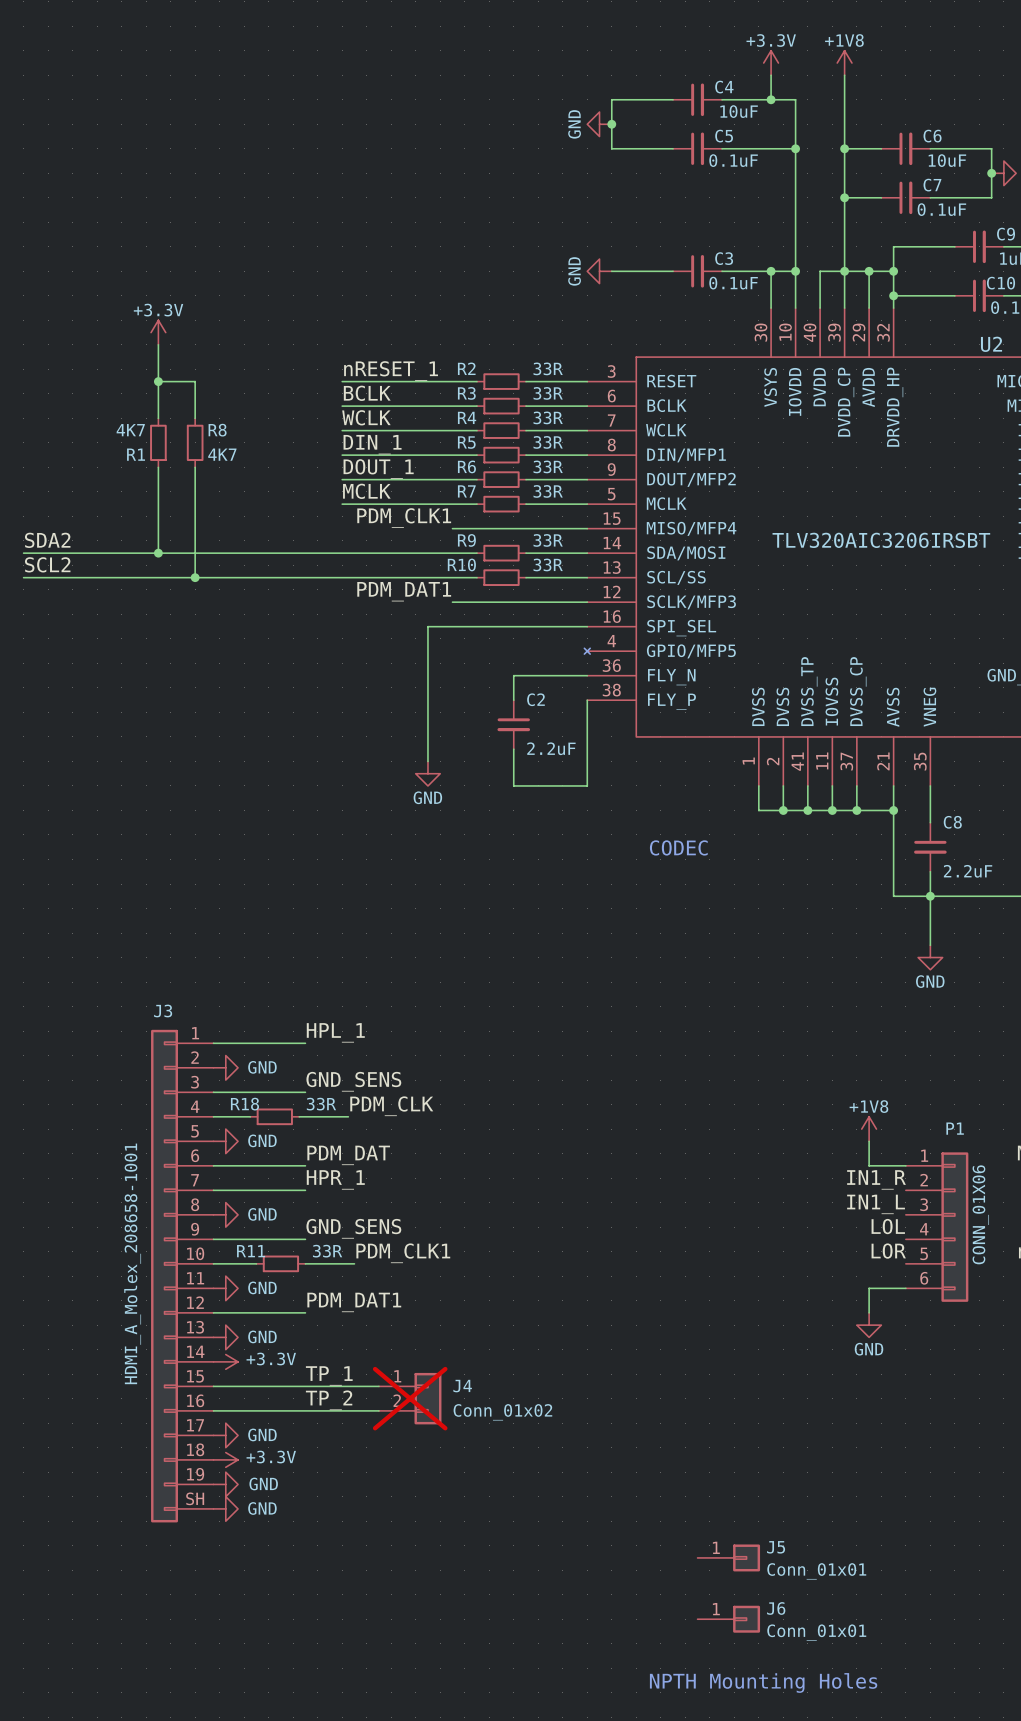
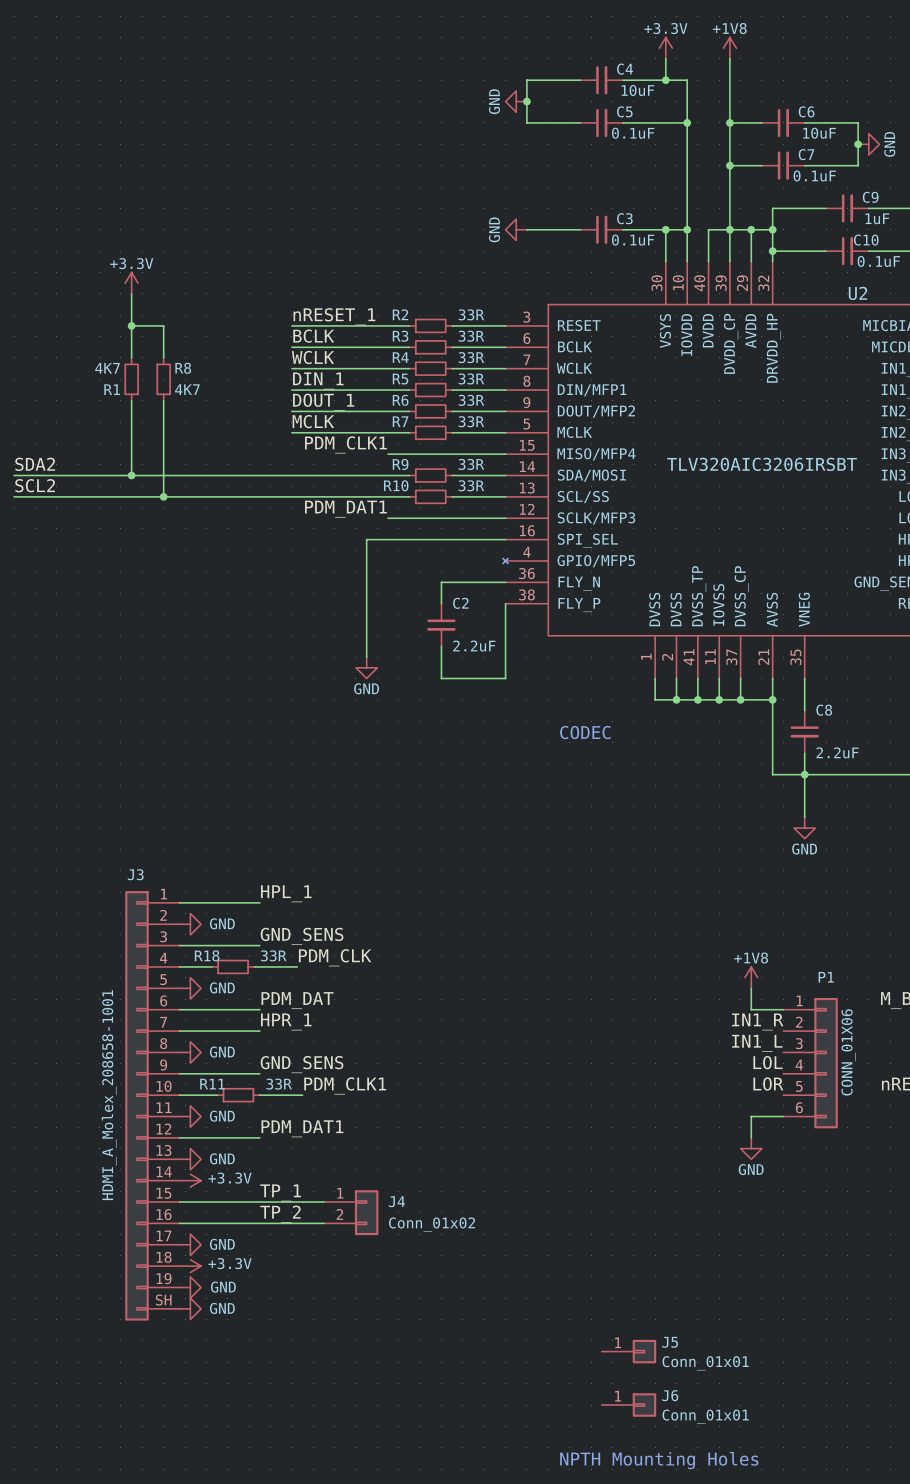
J4 do-not-place cross: (410, 1398) -> none

